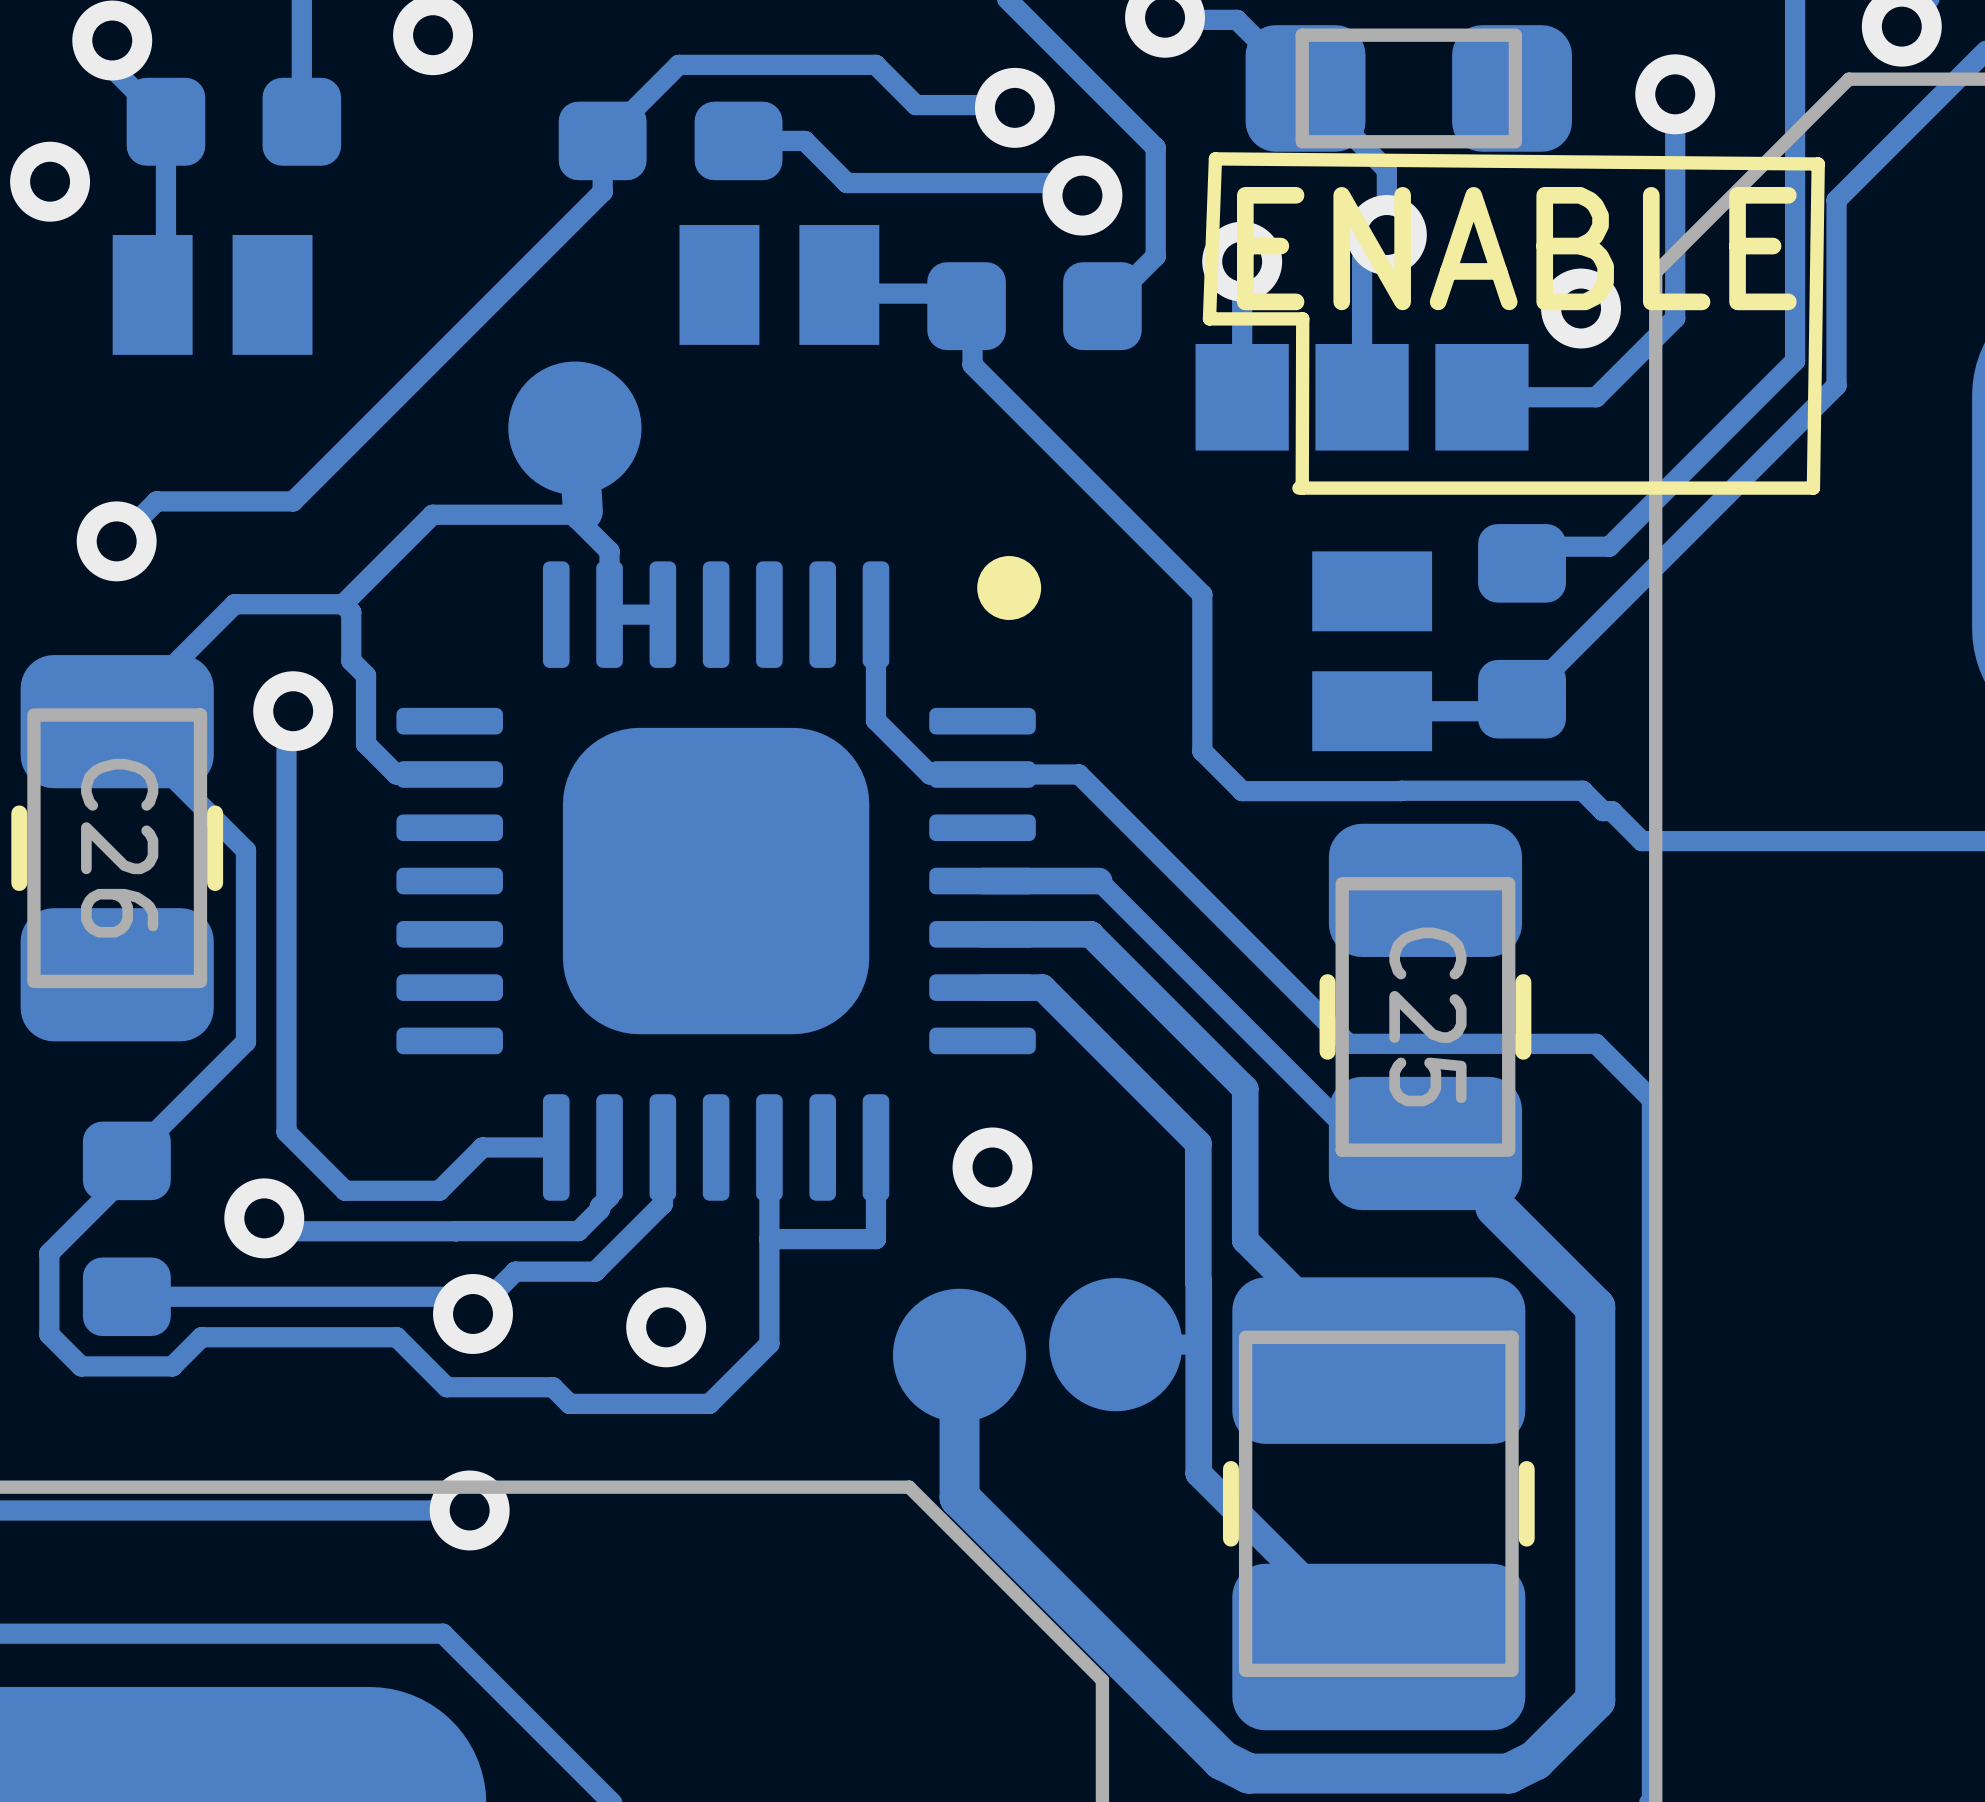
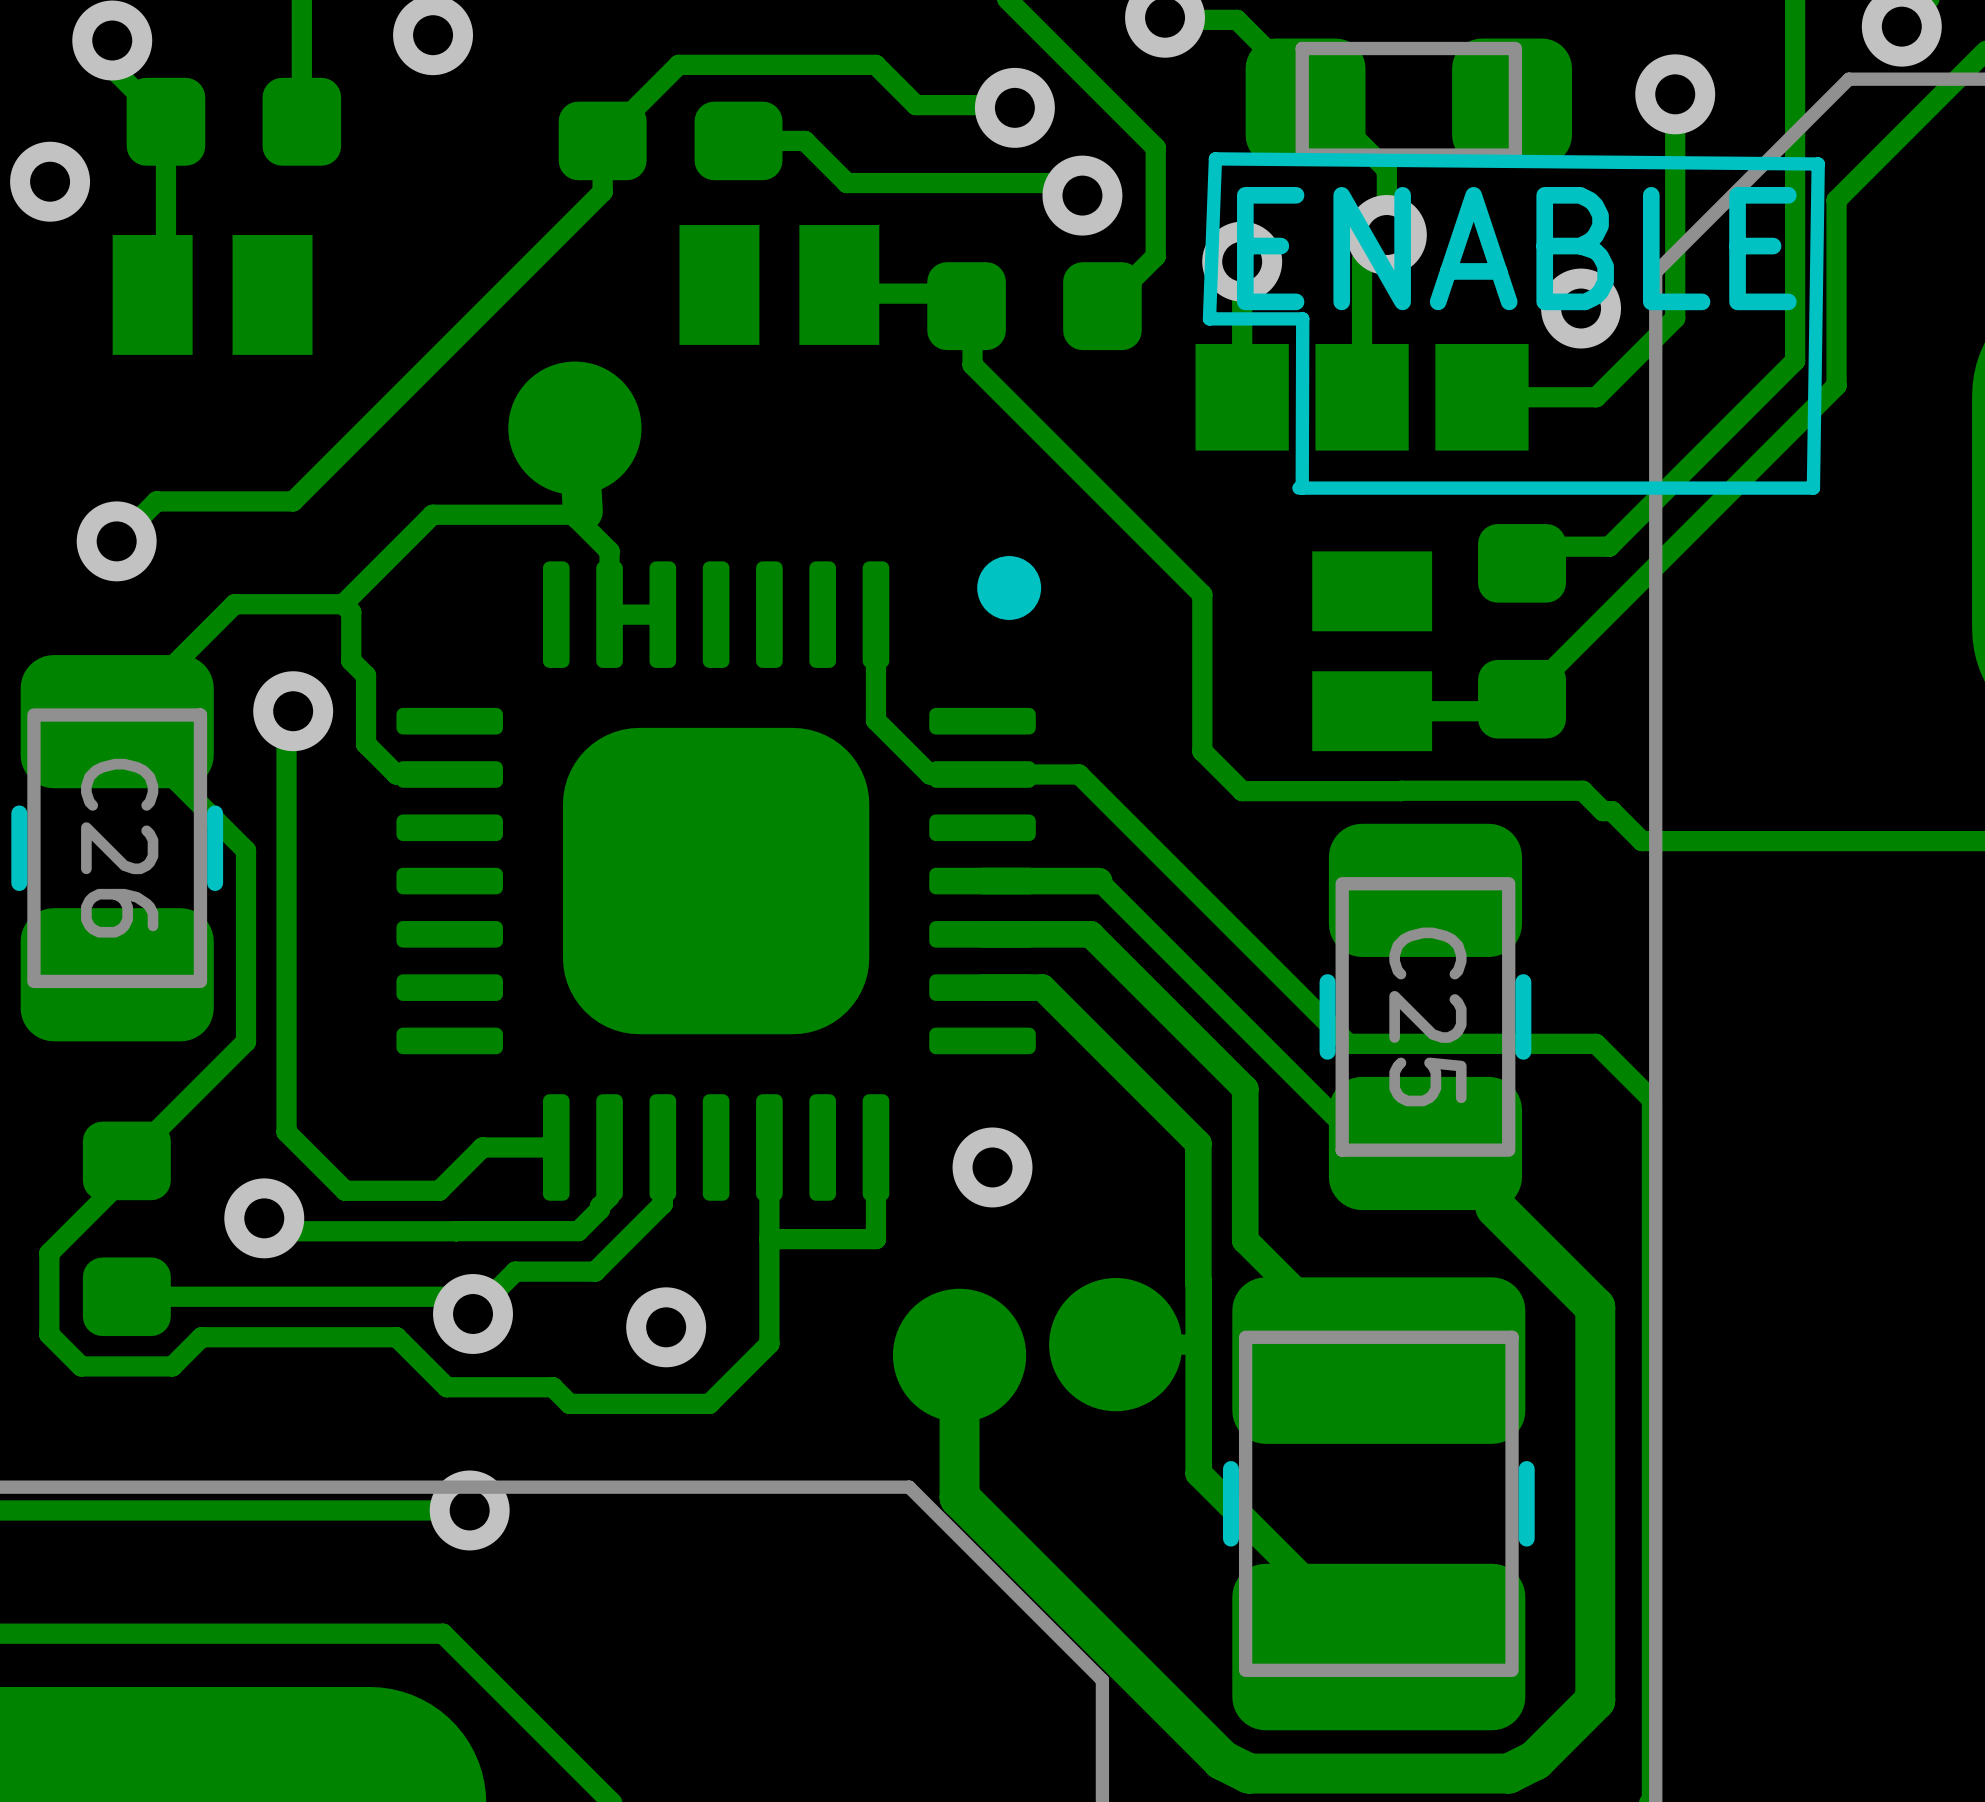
part position: (1408, 88) -> (1408, 101)

